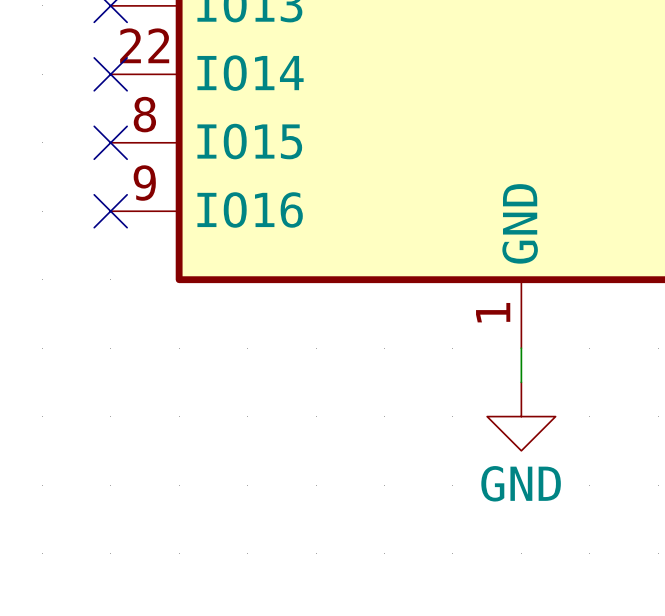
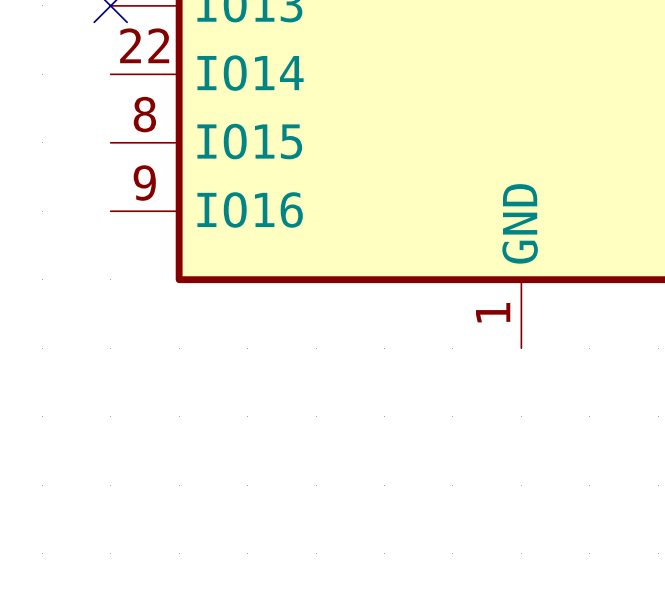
no-connect mark: (110, 74) -> none
no-connect mark: (110, 142) -> none
no-connect mark: (110, 211) -> none
wire: (521, 348) (521, 382) -> none
power symbol: GND (521, 416) -> none

